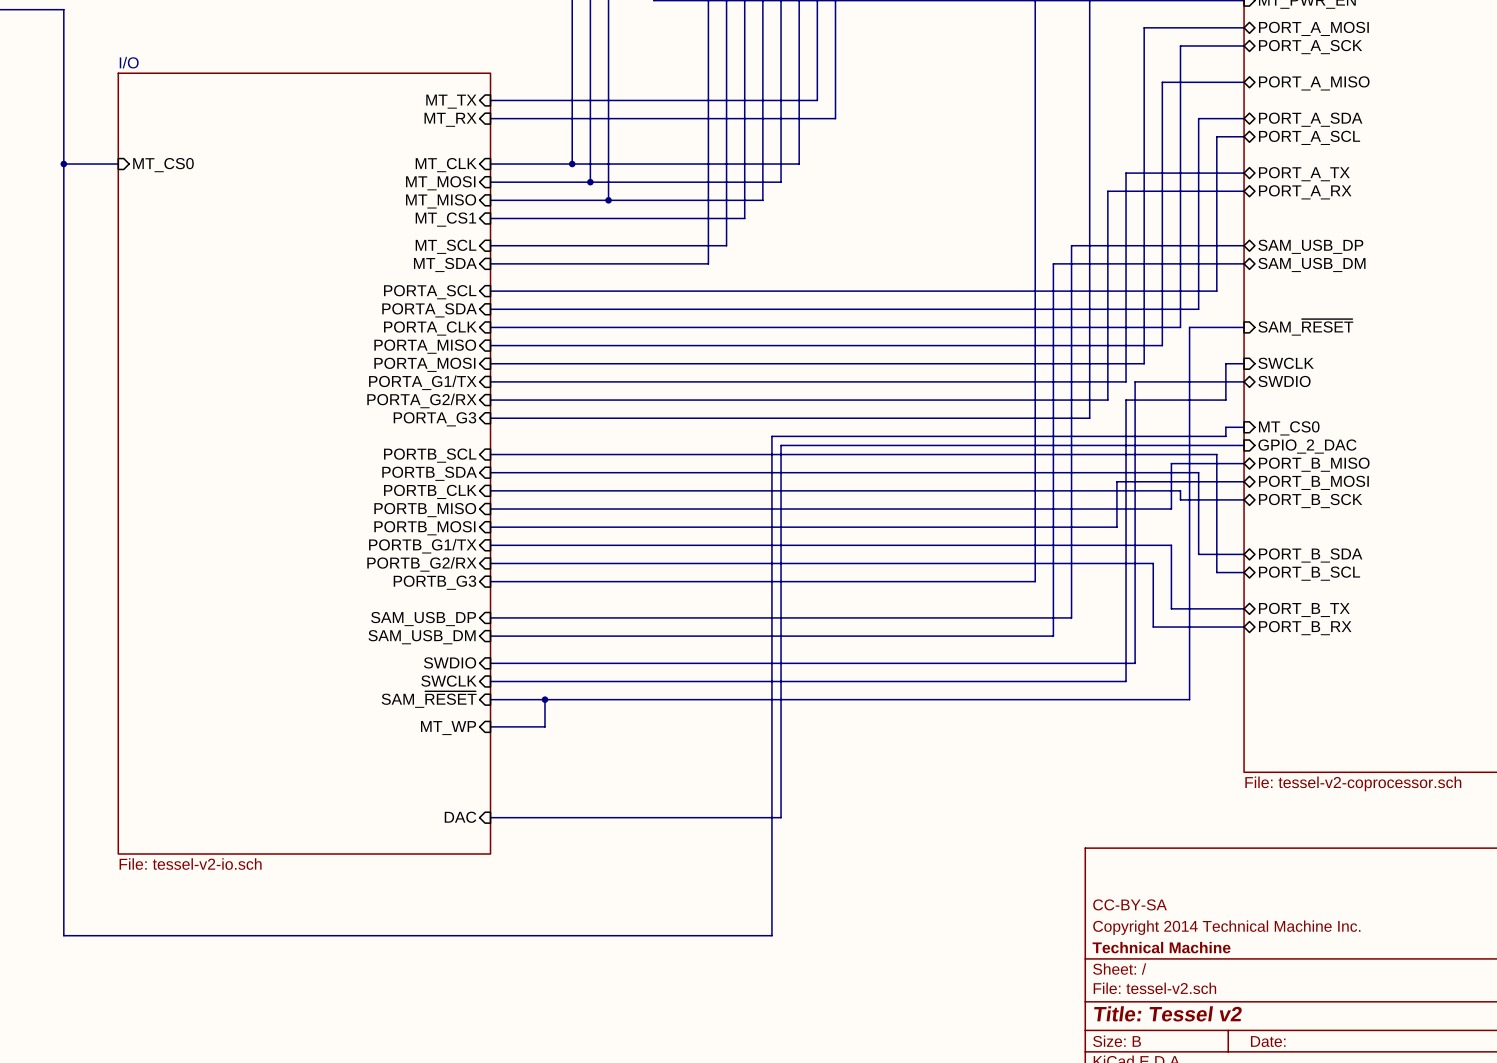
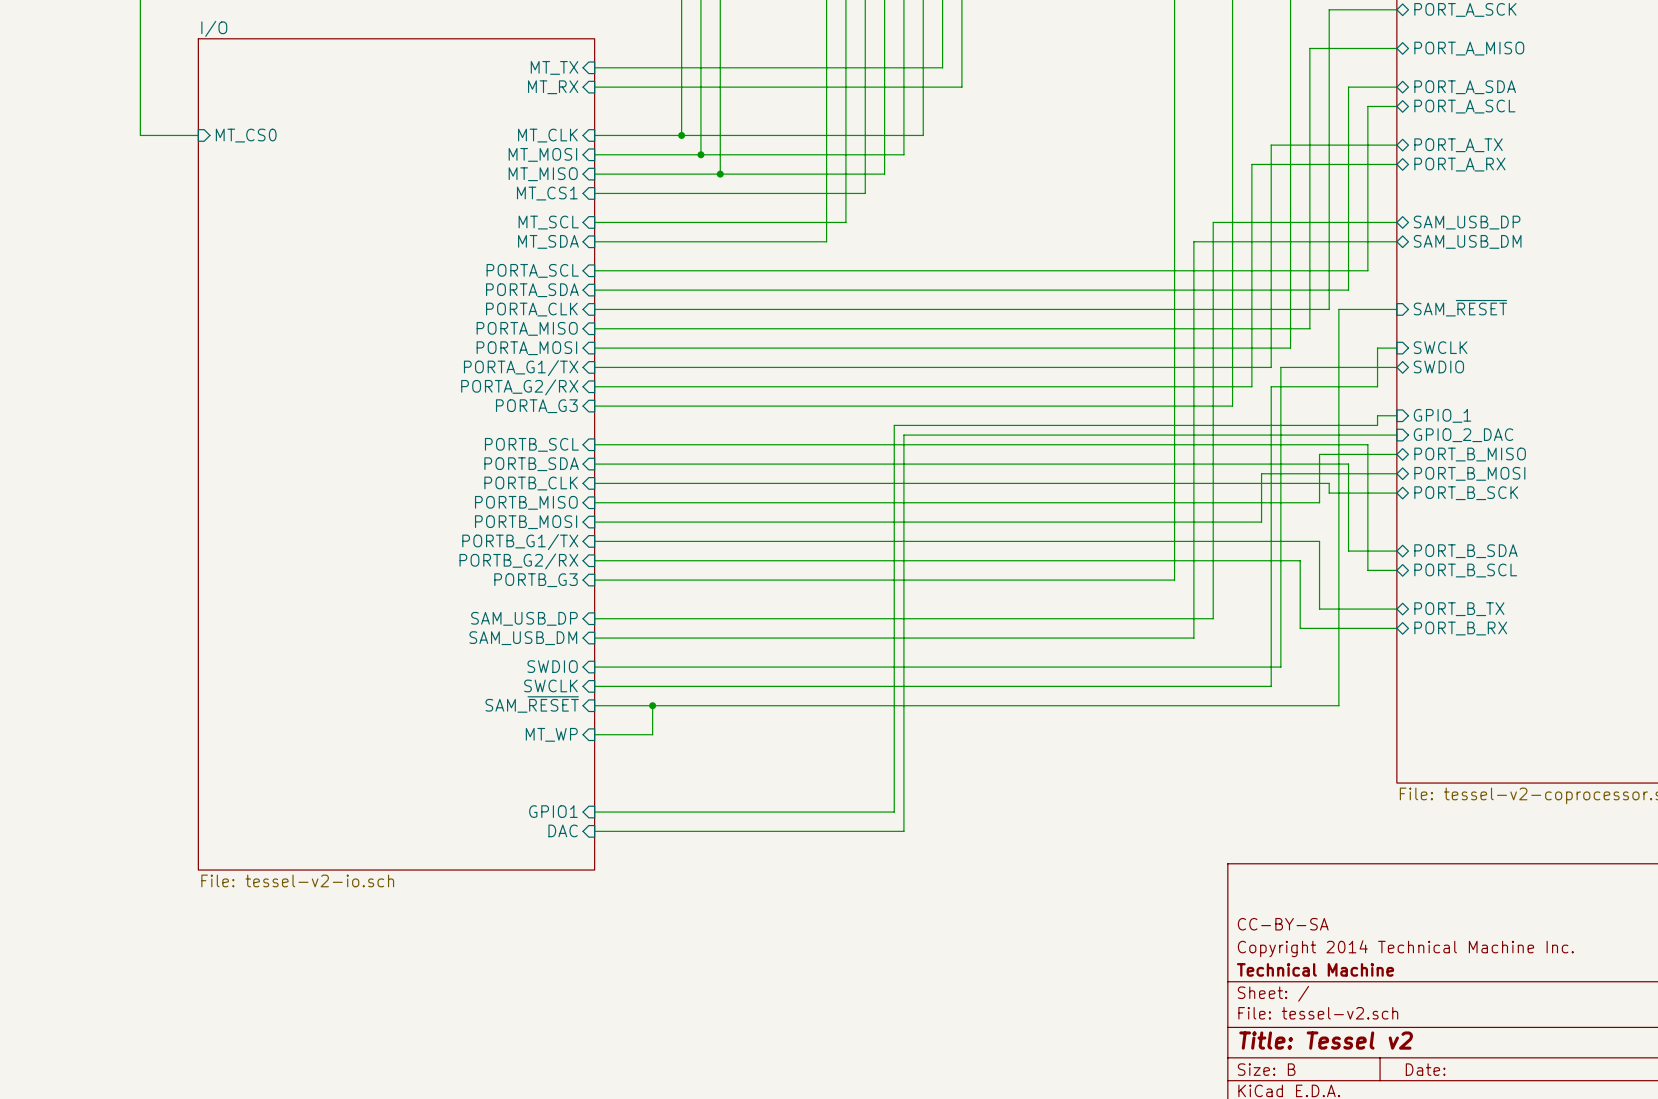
wire: (63, 164) (63, 935) (771, 935) (771, 799) -> (594, 812) (894, 812)
junction: (63, 164) -> none
sheet pin: MT_CS0 (1289, 428) -> GPIO_1 (1442, 415)
sheet pin: none -> GPIO1 (553, 811)

